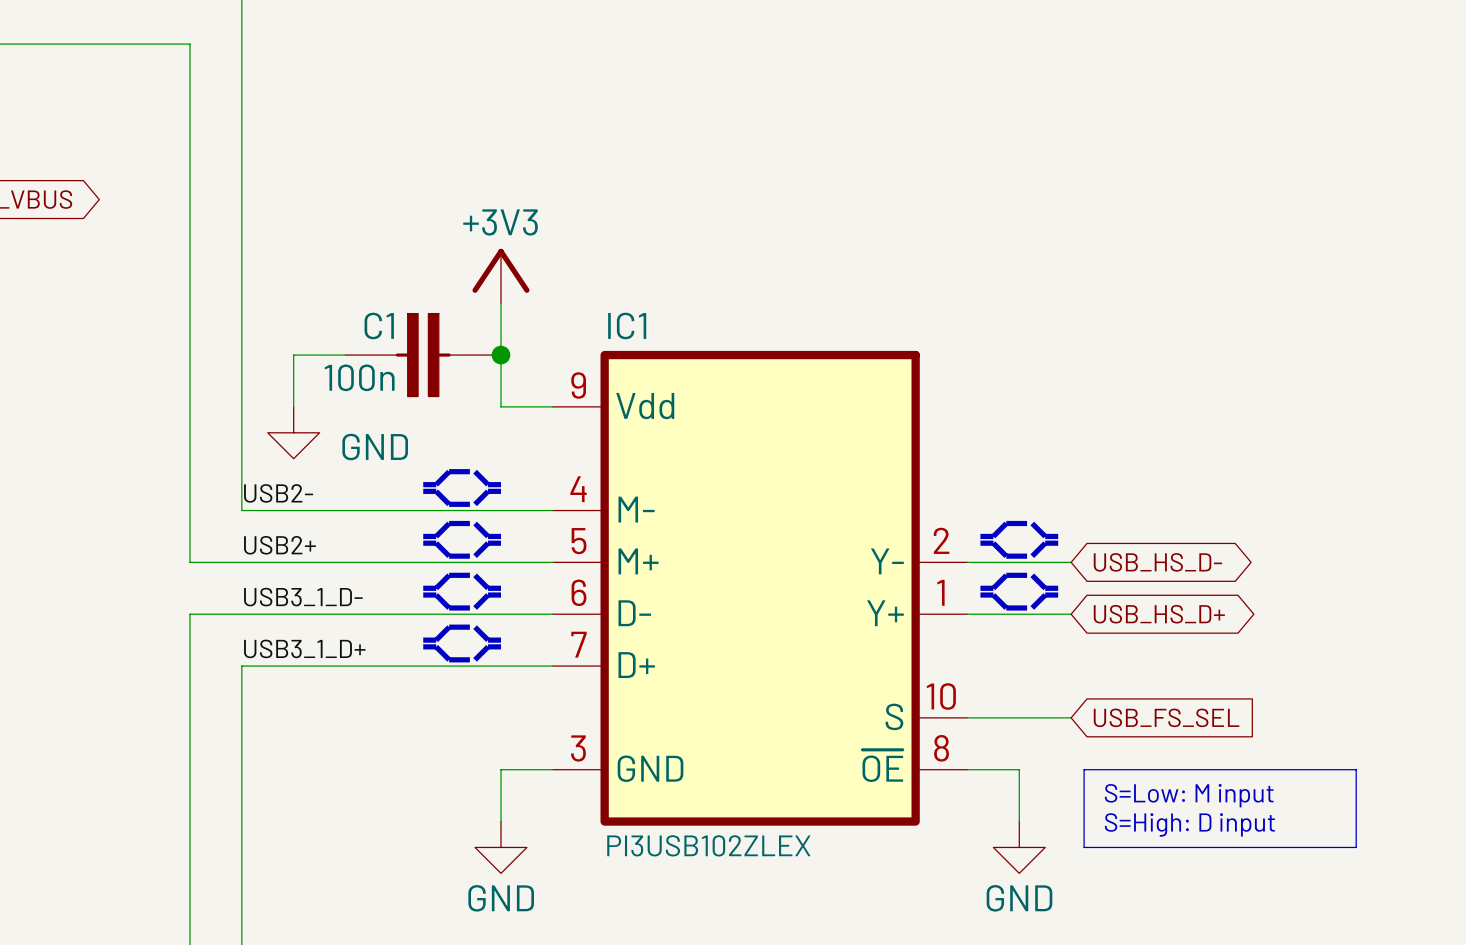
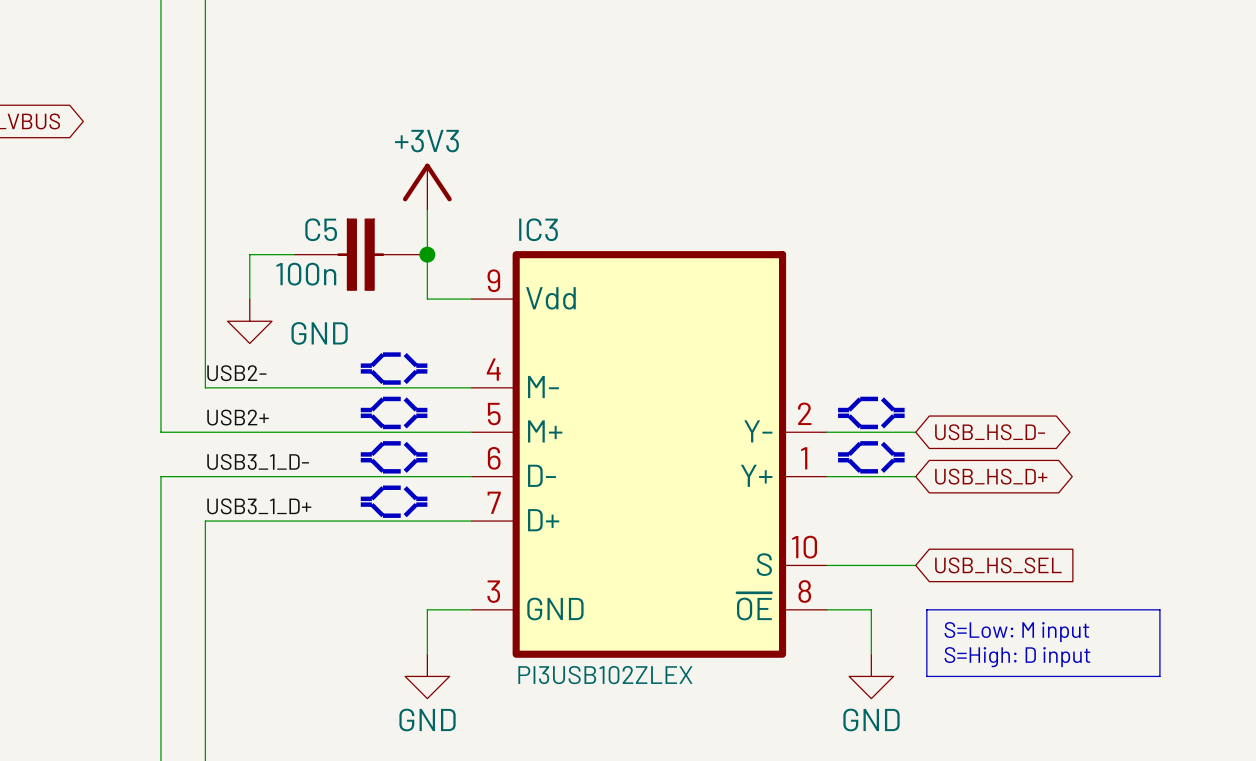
C1 name: C1 (379, 325) -> C5 (321, 229)
IC1 name: IC1 (627, 325) -> IC3 (538, 229)
global label: USB_FS_SEL (1166, 717) -> USB_HS_SEL (998, 565)

